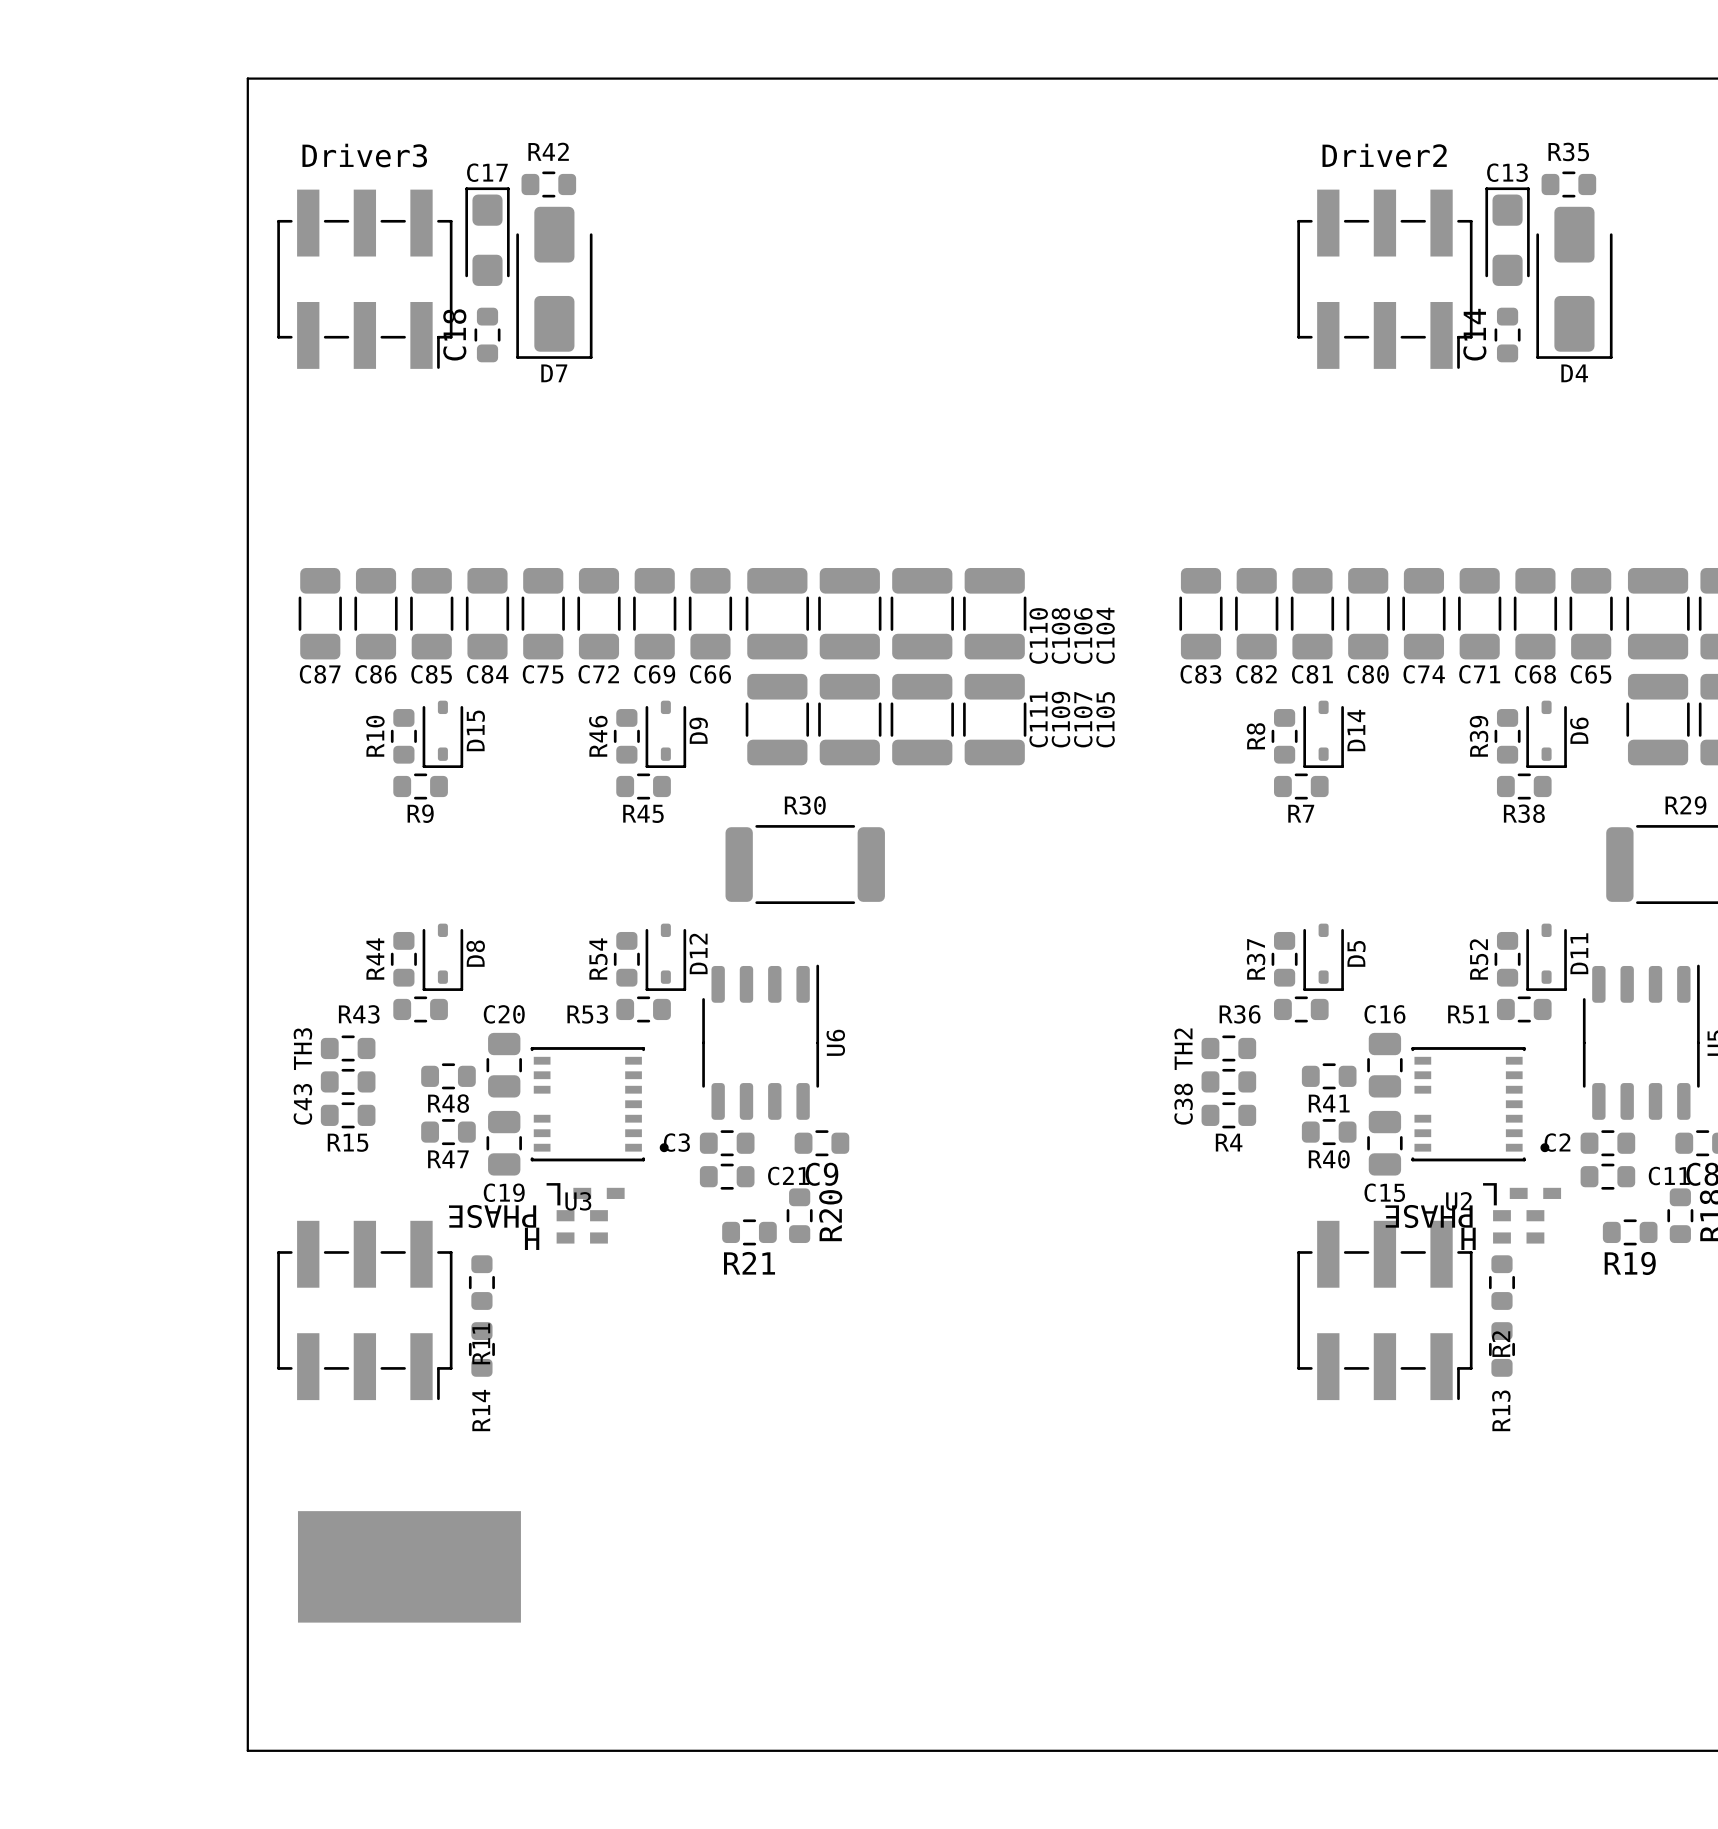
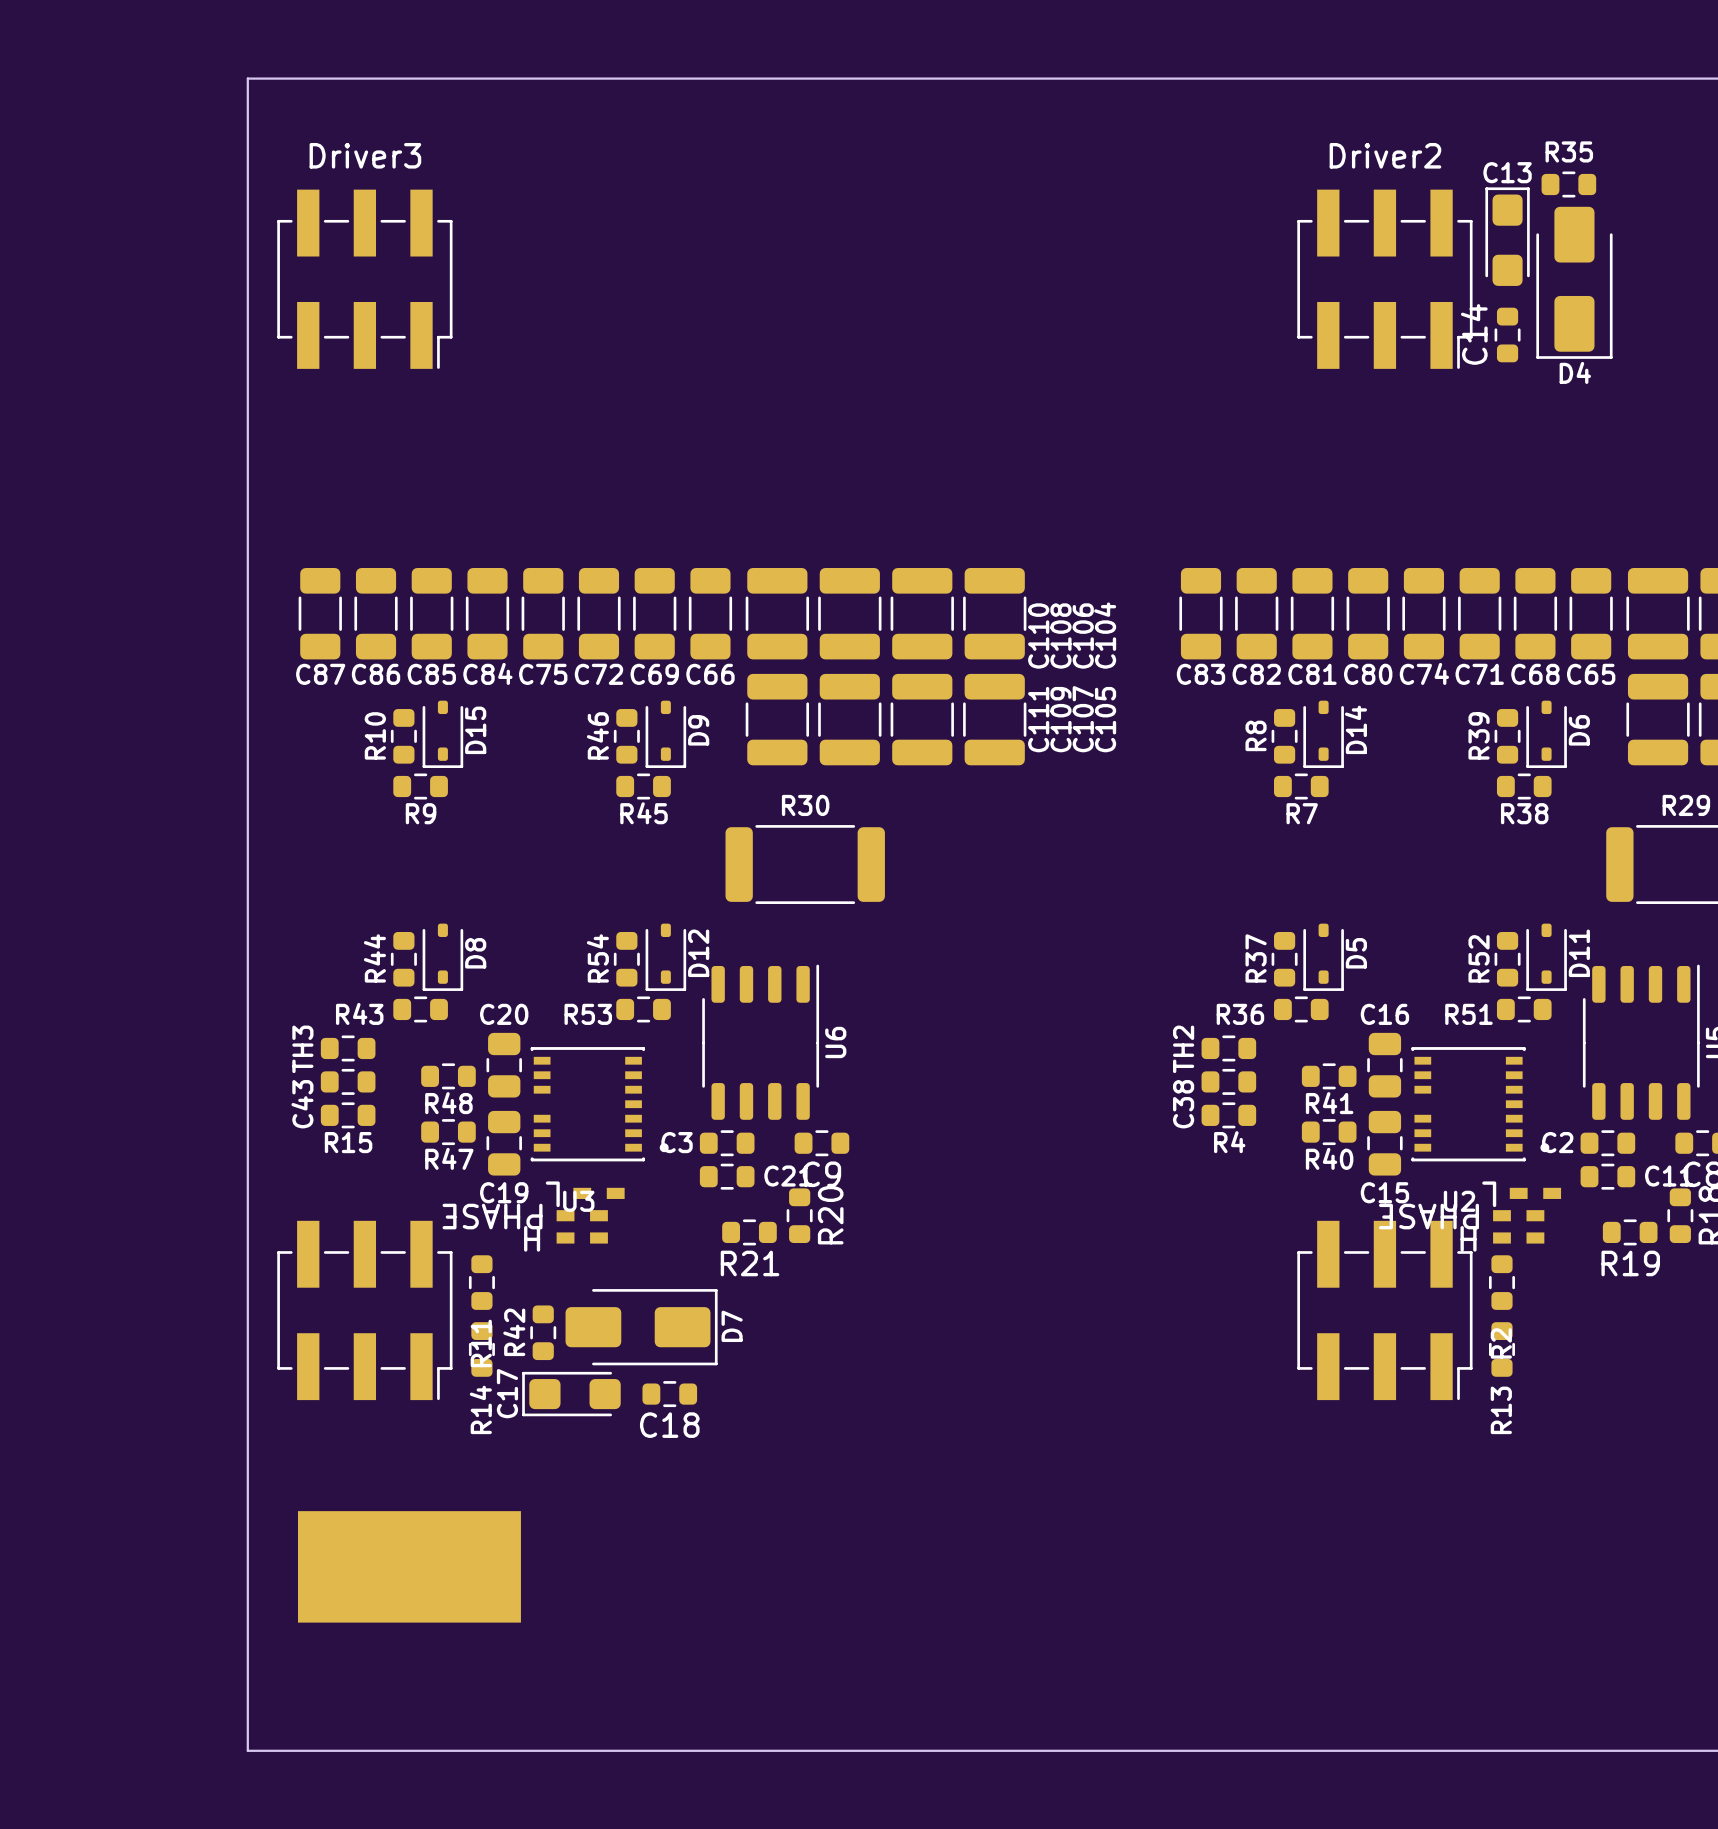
R42 rotation: 0° (548, 184) -> 90° clockwise (543, 1332)
R42 position: (548, 184) -> (543, 1332)
C17 rotation: 0° (487, 236) -> 90° counterclockwise (571, 1394)
C17 position: (487, 236) -> (571, 1394)
D7 rotation: 0° (554, 282) -> 90° counterclockwise (641, 1327)
D7 position: (554, 282) -> (641, 1327)
C18 name position: C18 (454, 334) -> C18 (669, 1425)
C18 rotation: 0° (487, 334) -> 90° clockwise (669, 1394)
C18 position: (487, 334) -> (669, 1394)

